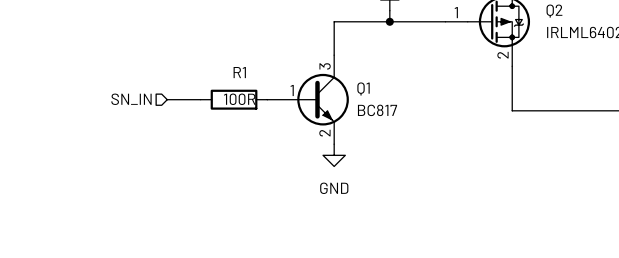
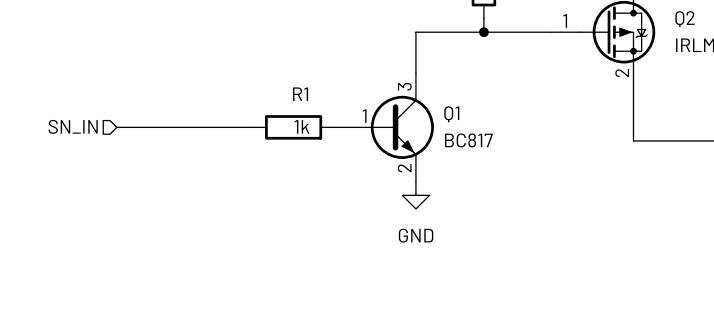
wire: none -> (116, 127) (212, 127)
hierarchical label position: SN_IN (131, 99) -> SN_IN (73, 126)
R1 value: 100R (239, 99) -> 1k (301, 126)

